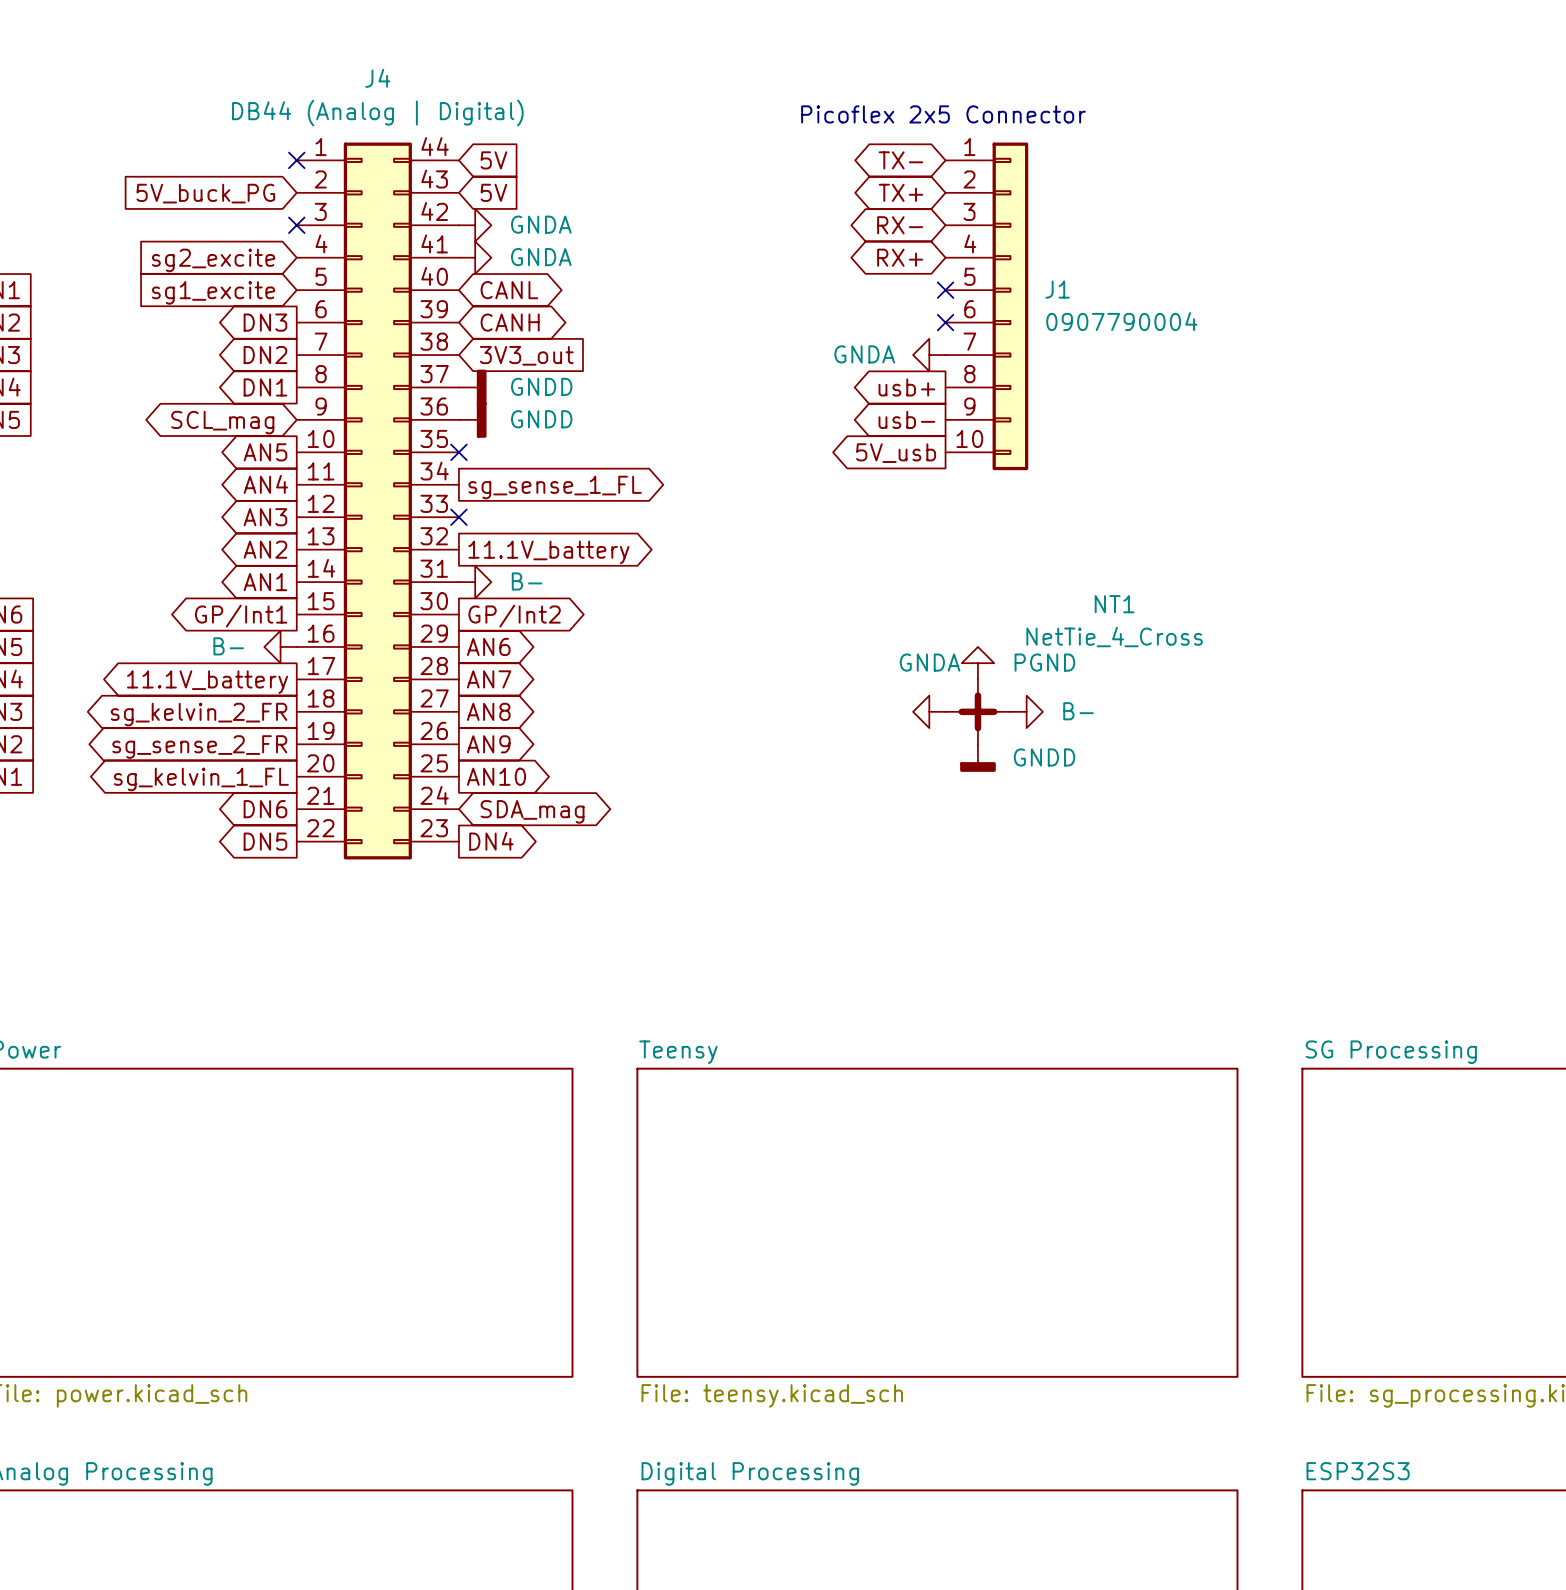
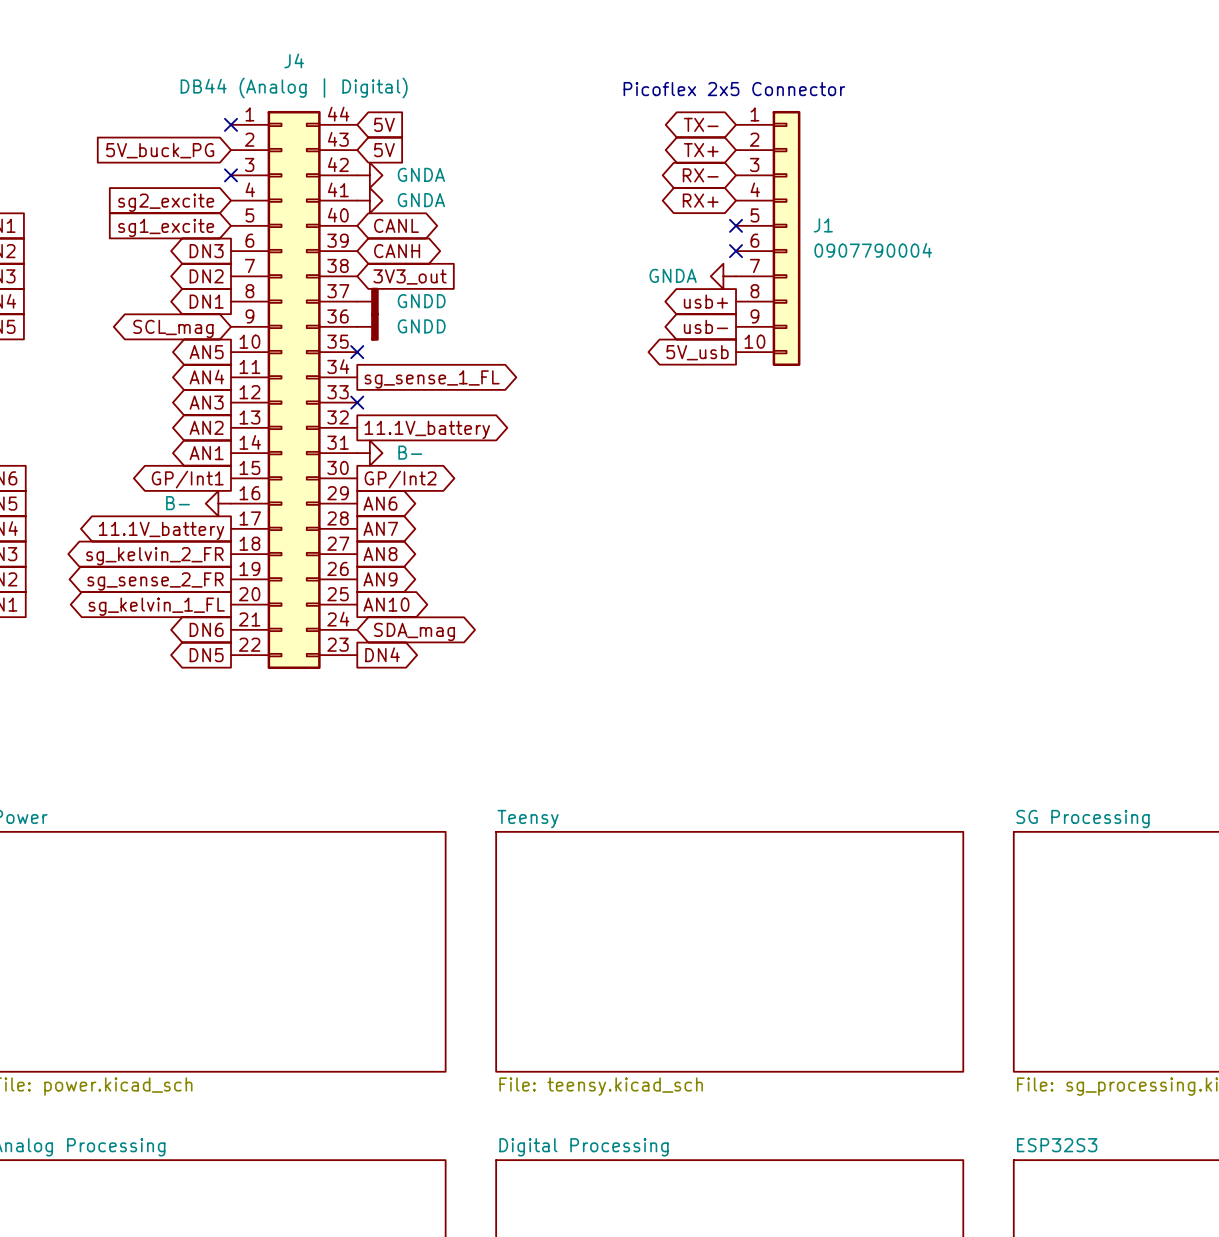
power symbol: PGND (977, 663) -> none
power symbol: GNDA (929, 711) -> none
NT1: NetTie_4_Cross (977, 711) -> none
power symbol: B- (1026, 711) -> none
power symbol: GNDD (977, 758) -> none

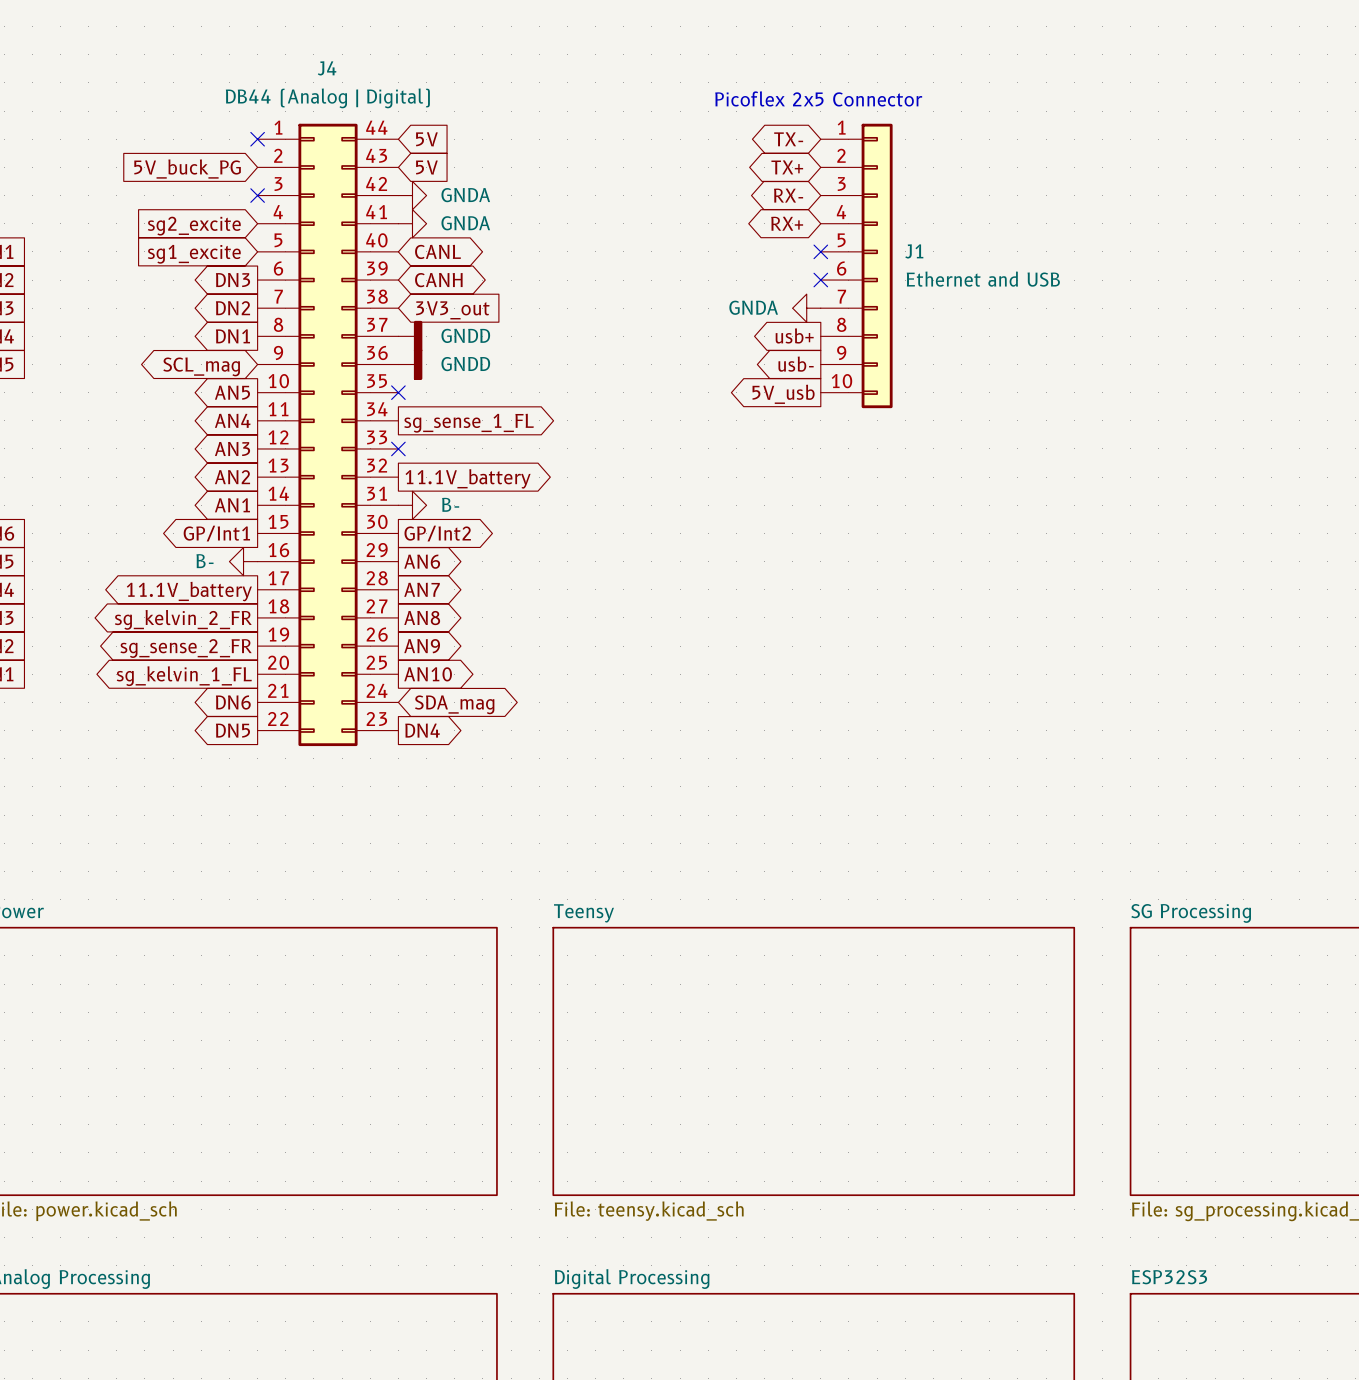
J1 value: 0907790004 (873, 250) -> Ethernet and USB (983, 279)

